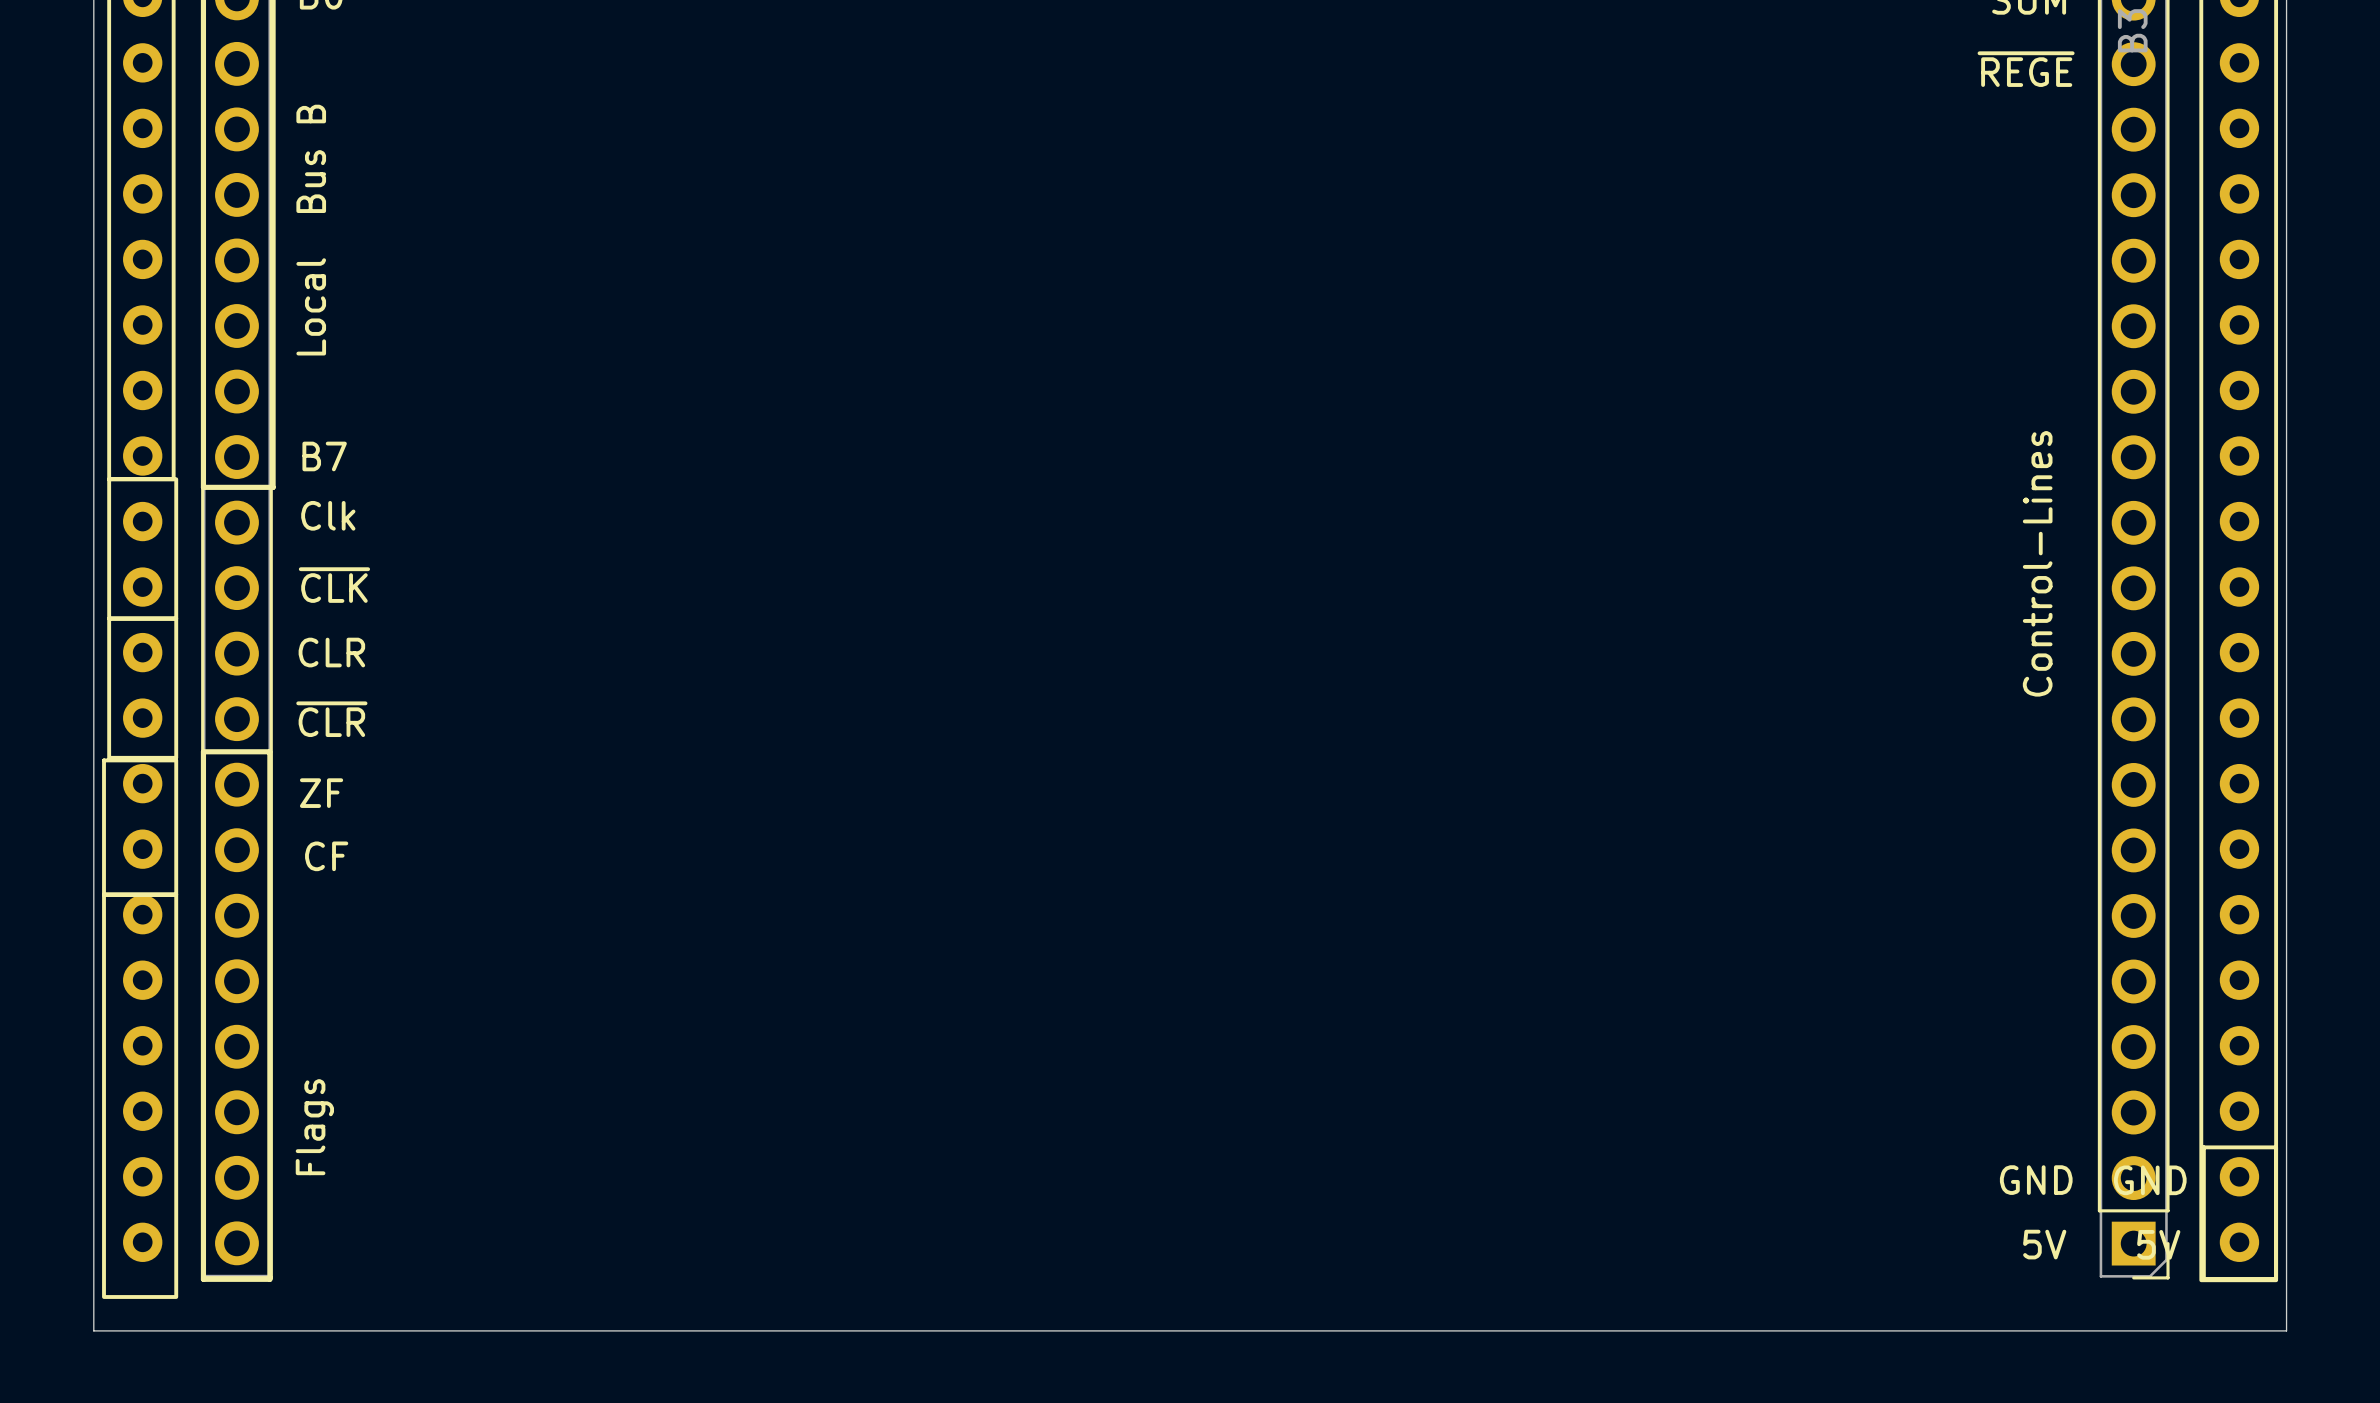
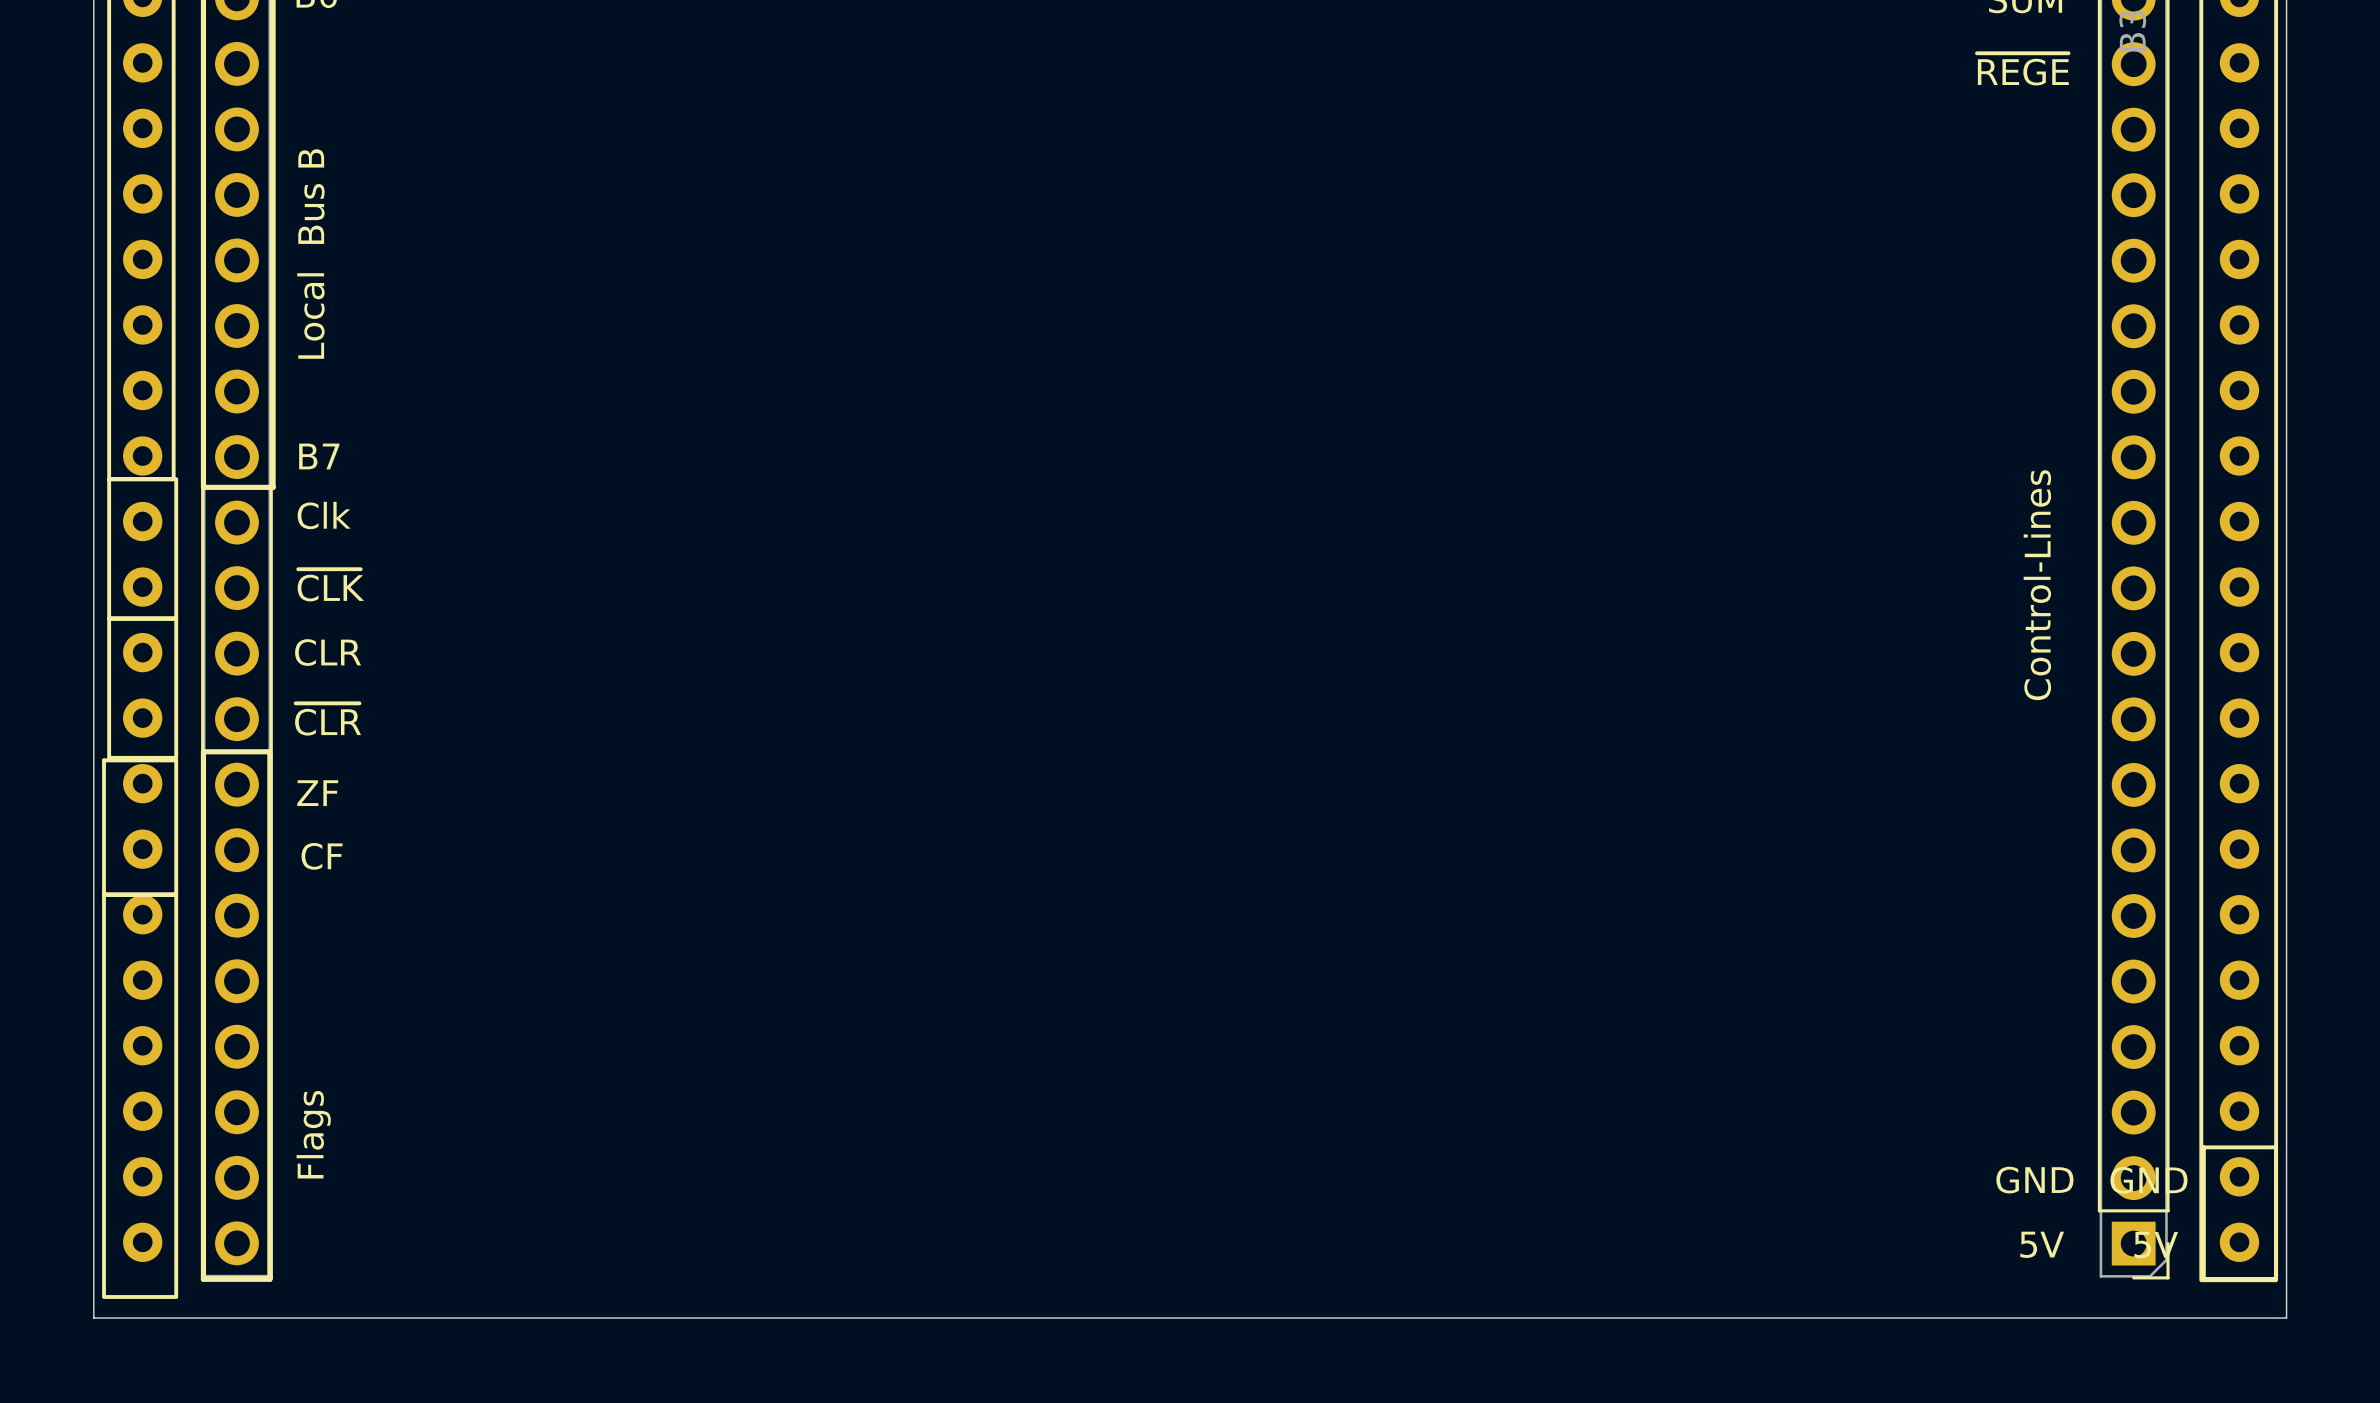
board edge: (93, 1318) (93, 1330) (2286, 1330) (2286, 1318) -> (93, 1318) (2286, 1318)

